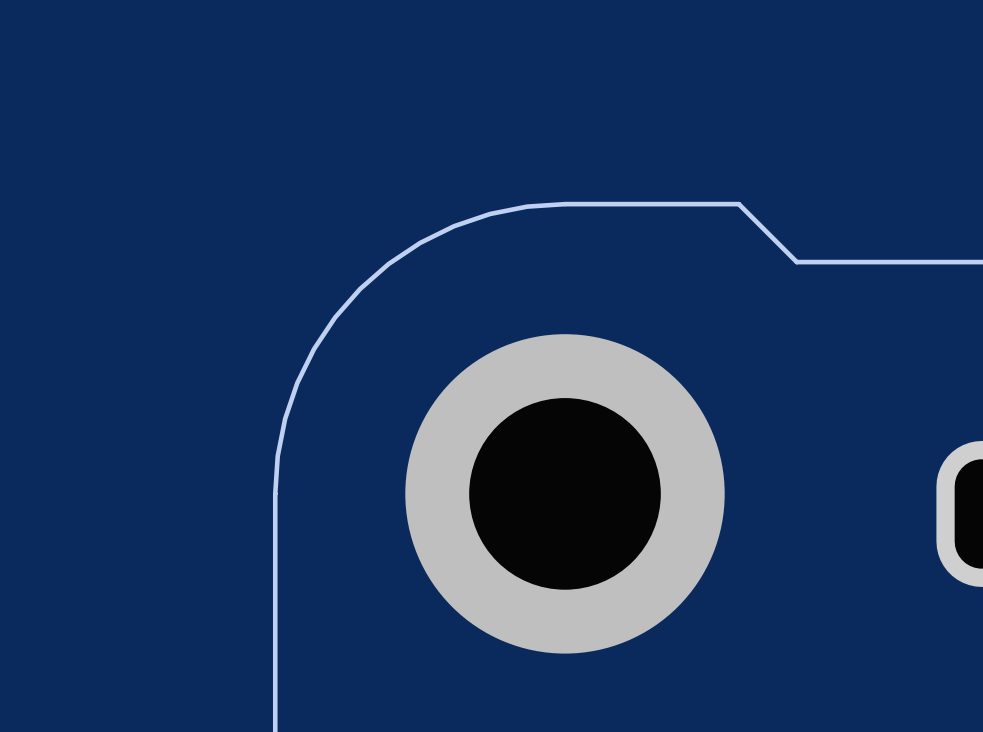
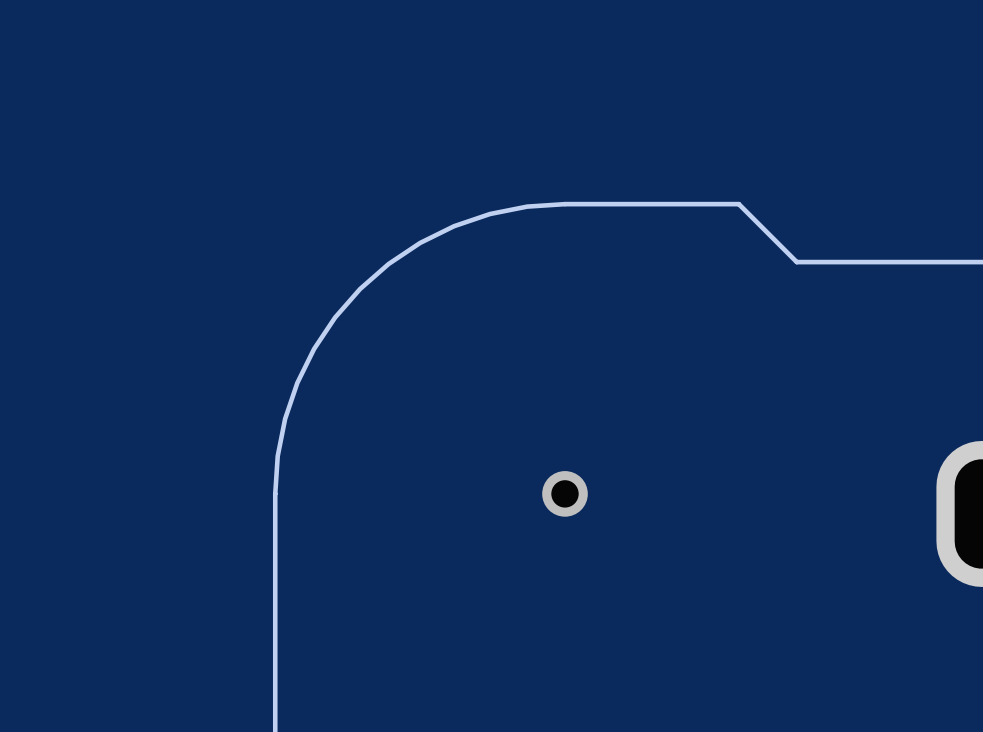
via size: [405, 334, 725, 654] -> [542, 471, 588, 517]

